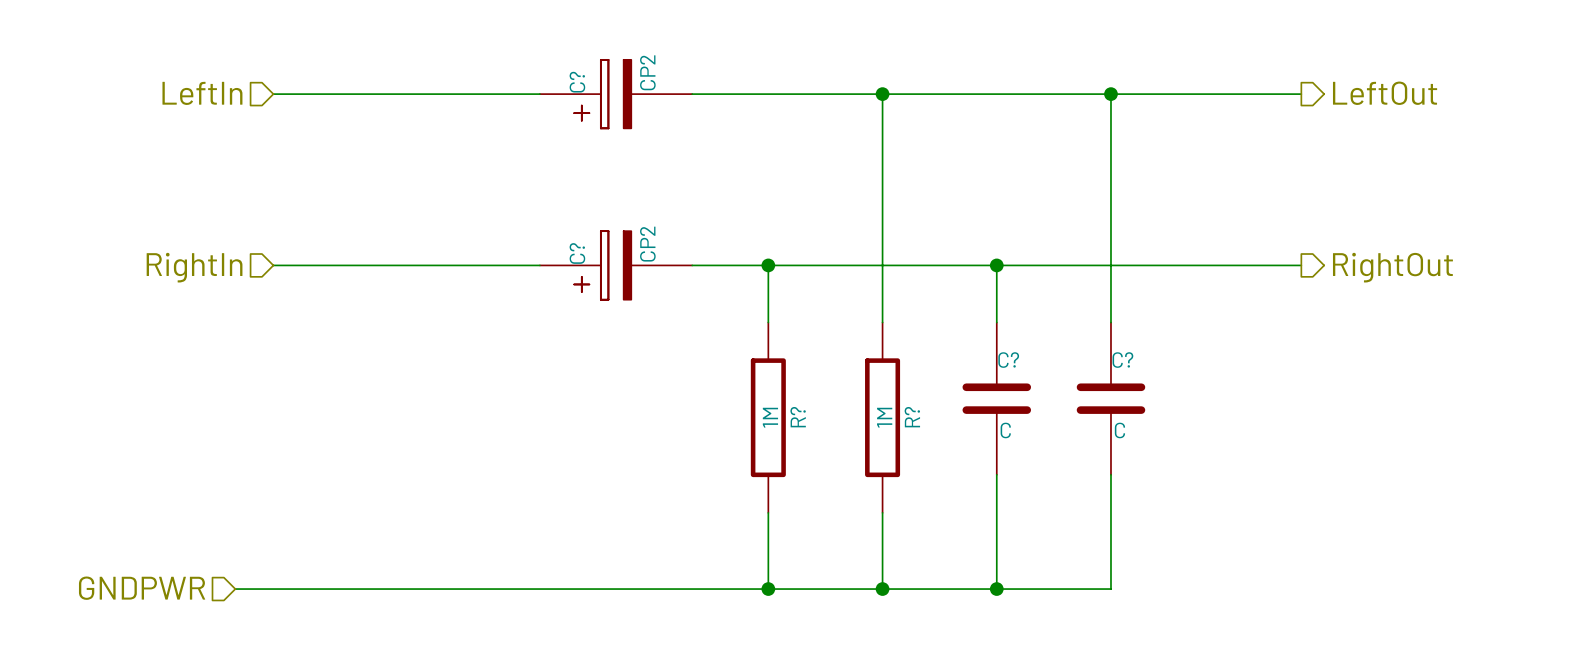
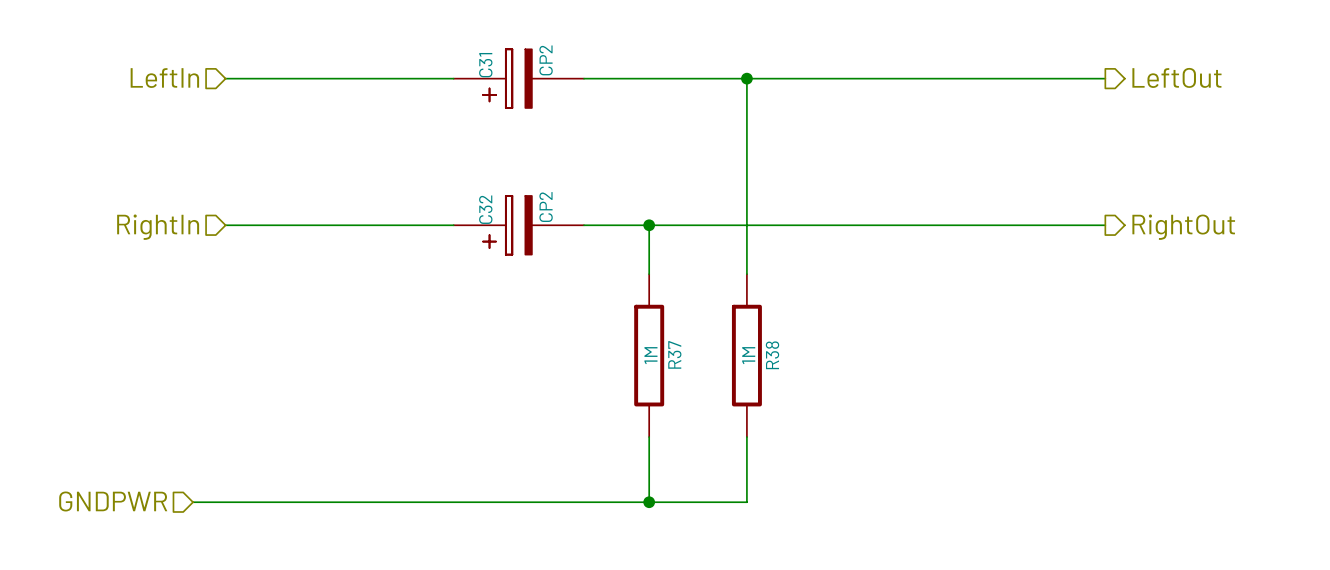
C? name: C? (577, 82) -> C31 (485, 65)
wire: (1110, 94) (1110, 322) -> none
junction: (1110, 94) -> none
C? name: C? (577, 253) -> C32 (485, 209)
wire: (996, 265) (996, 322) -> none
junction: (996, 265) -> none
C?: C (996, 398) -> none
C?: C (1110, 398) -> none
R? name: R? (798, 417) -> R37 (674, 354)
R? name: R? (912, 417) -> R38 (772, 355)
wire: (996, 474) (996, 589) -> none
wire: (1110, 474) (1110, 589) (882, 589) -> none
junction: (882, 589) -> none
junction: (996, 589) -> none

